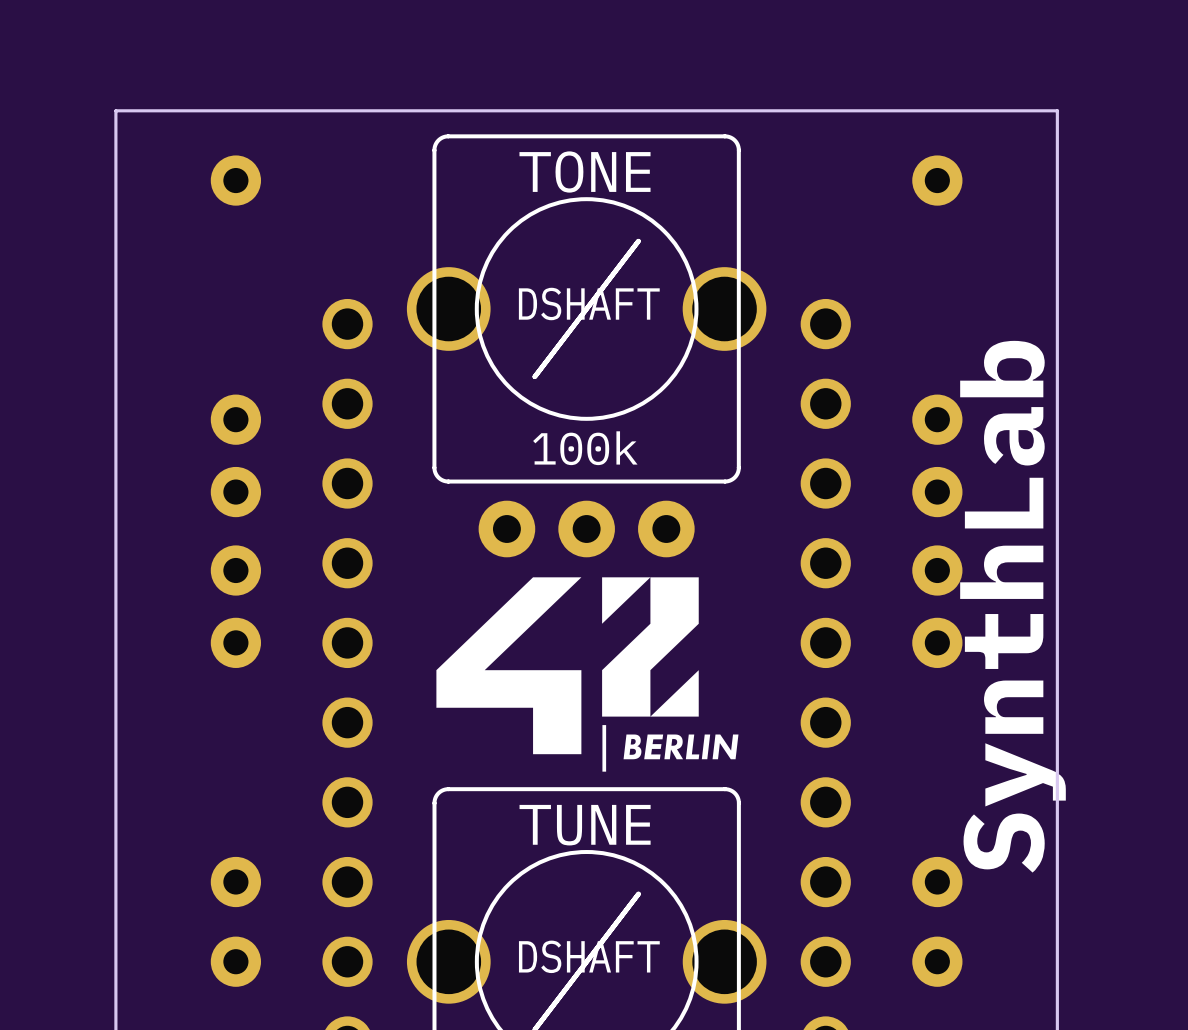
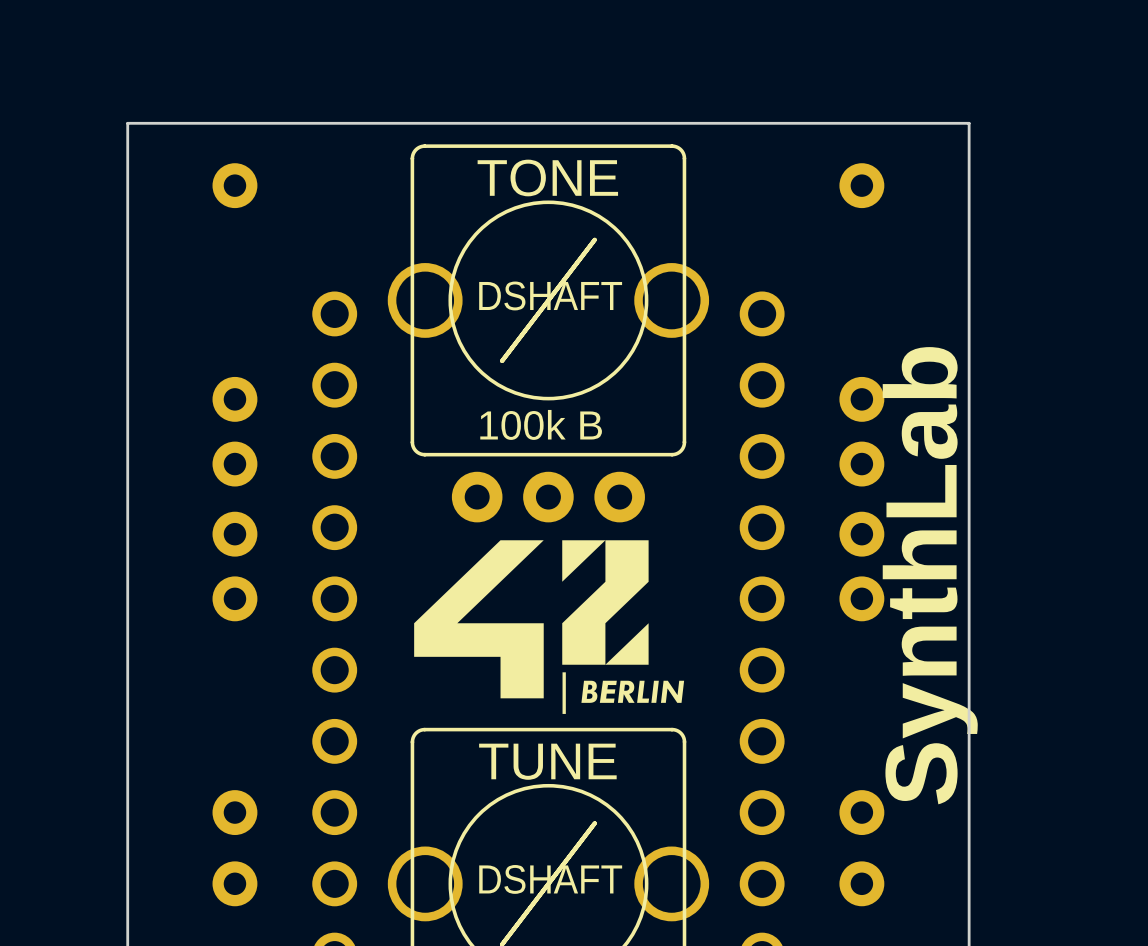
part value: 100k (585, 448) -> 100k B (541, 424)

